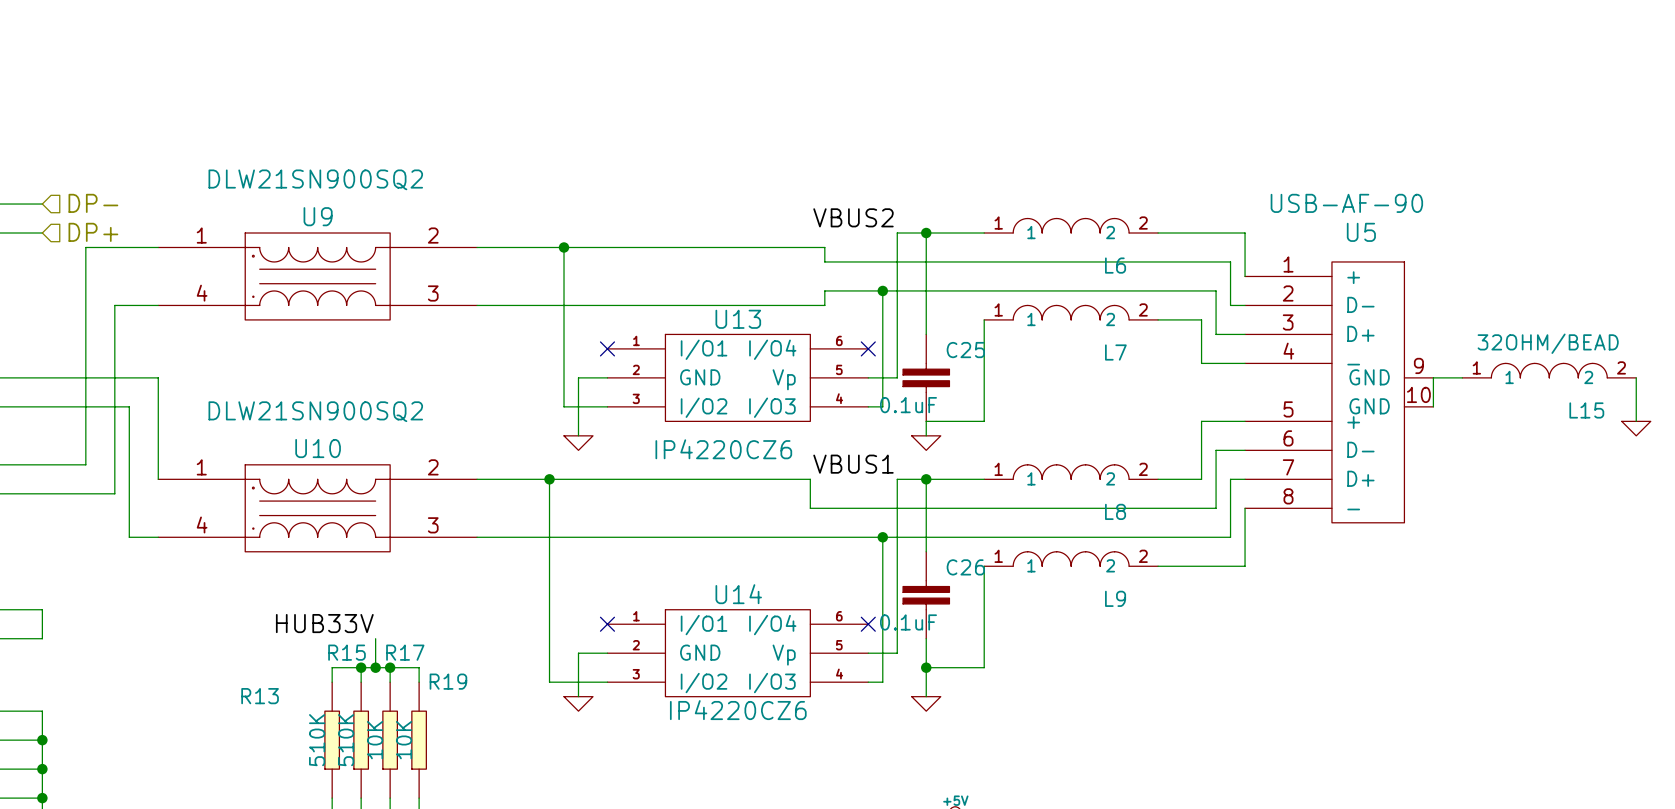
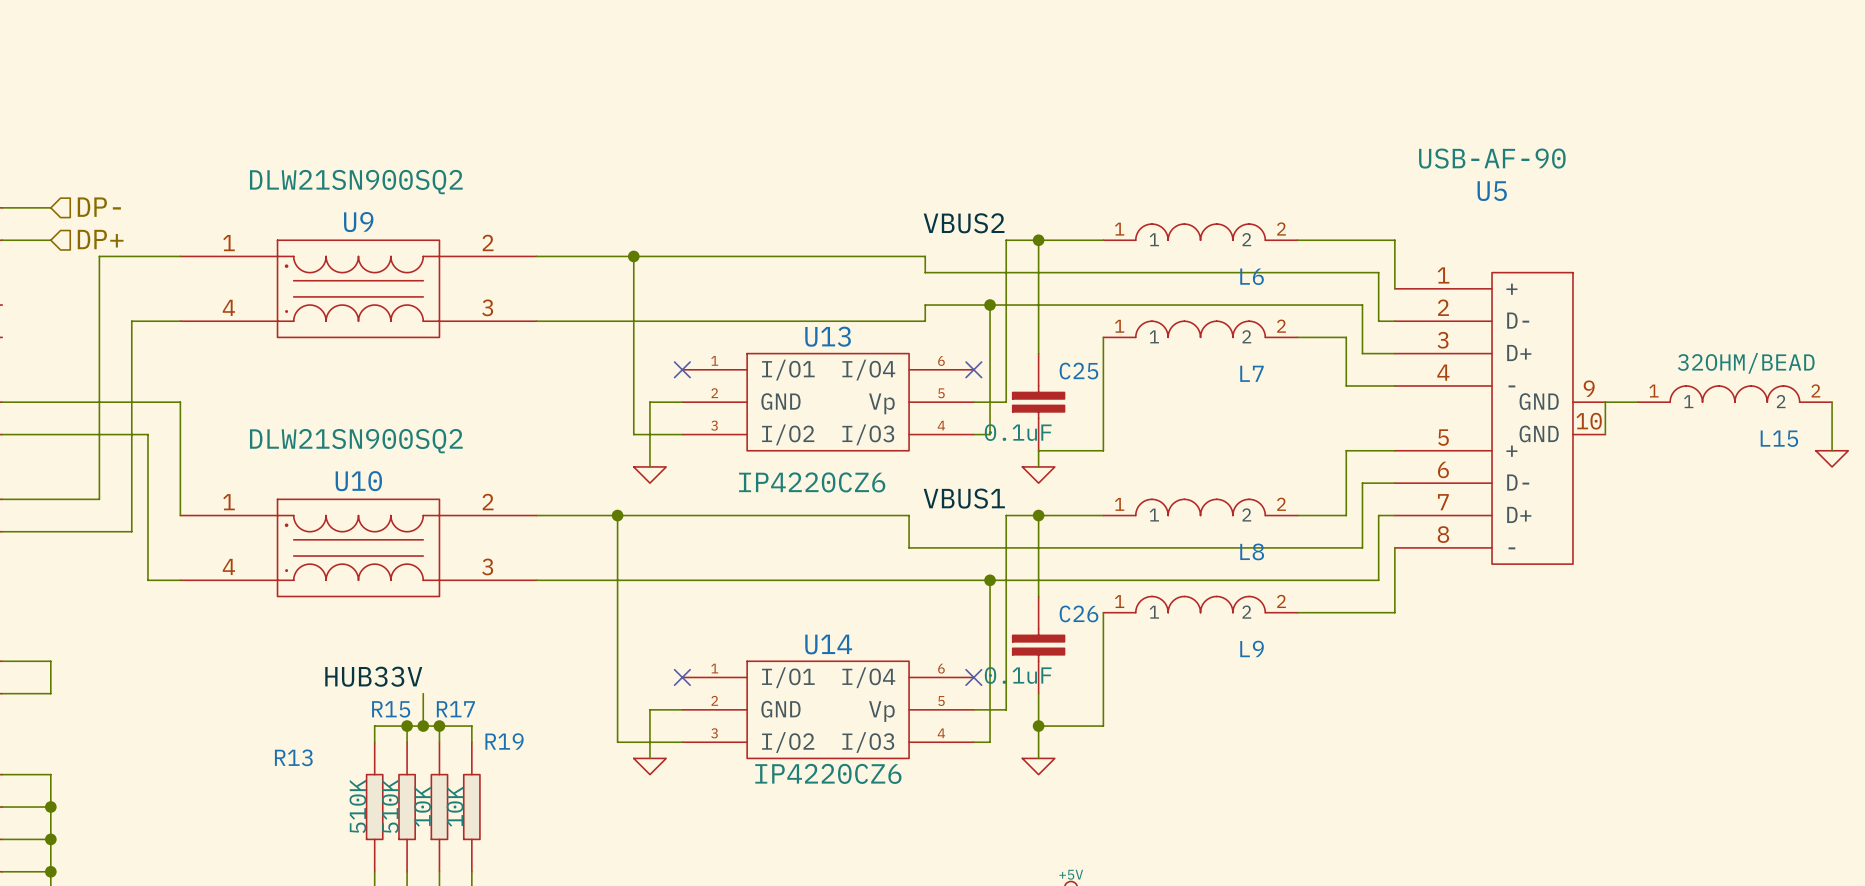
U5 value position: USB-AF-90 (1346, 203) -> USB-AF-90 (1492, 158)
U5 name position: U5 (1361, 232) -> U5 (1492, 191)

